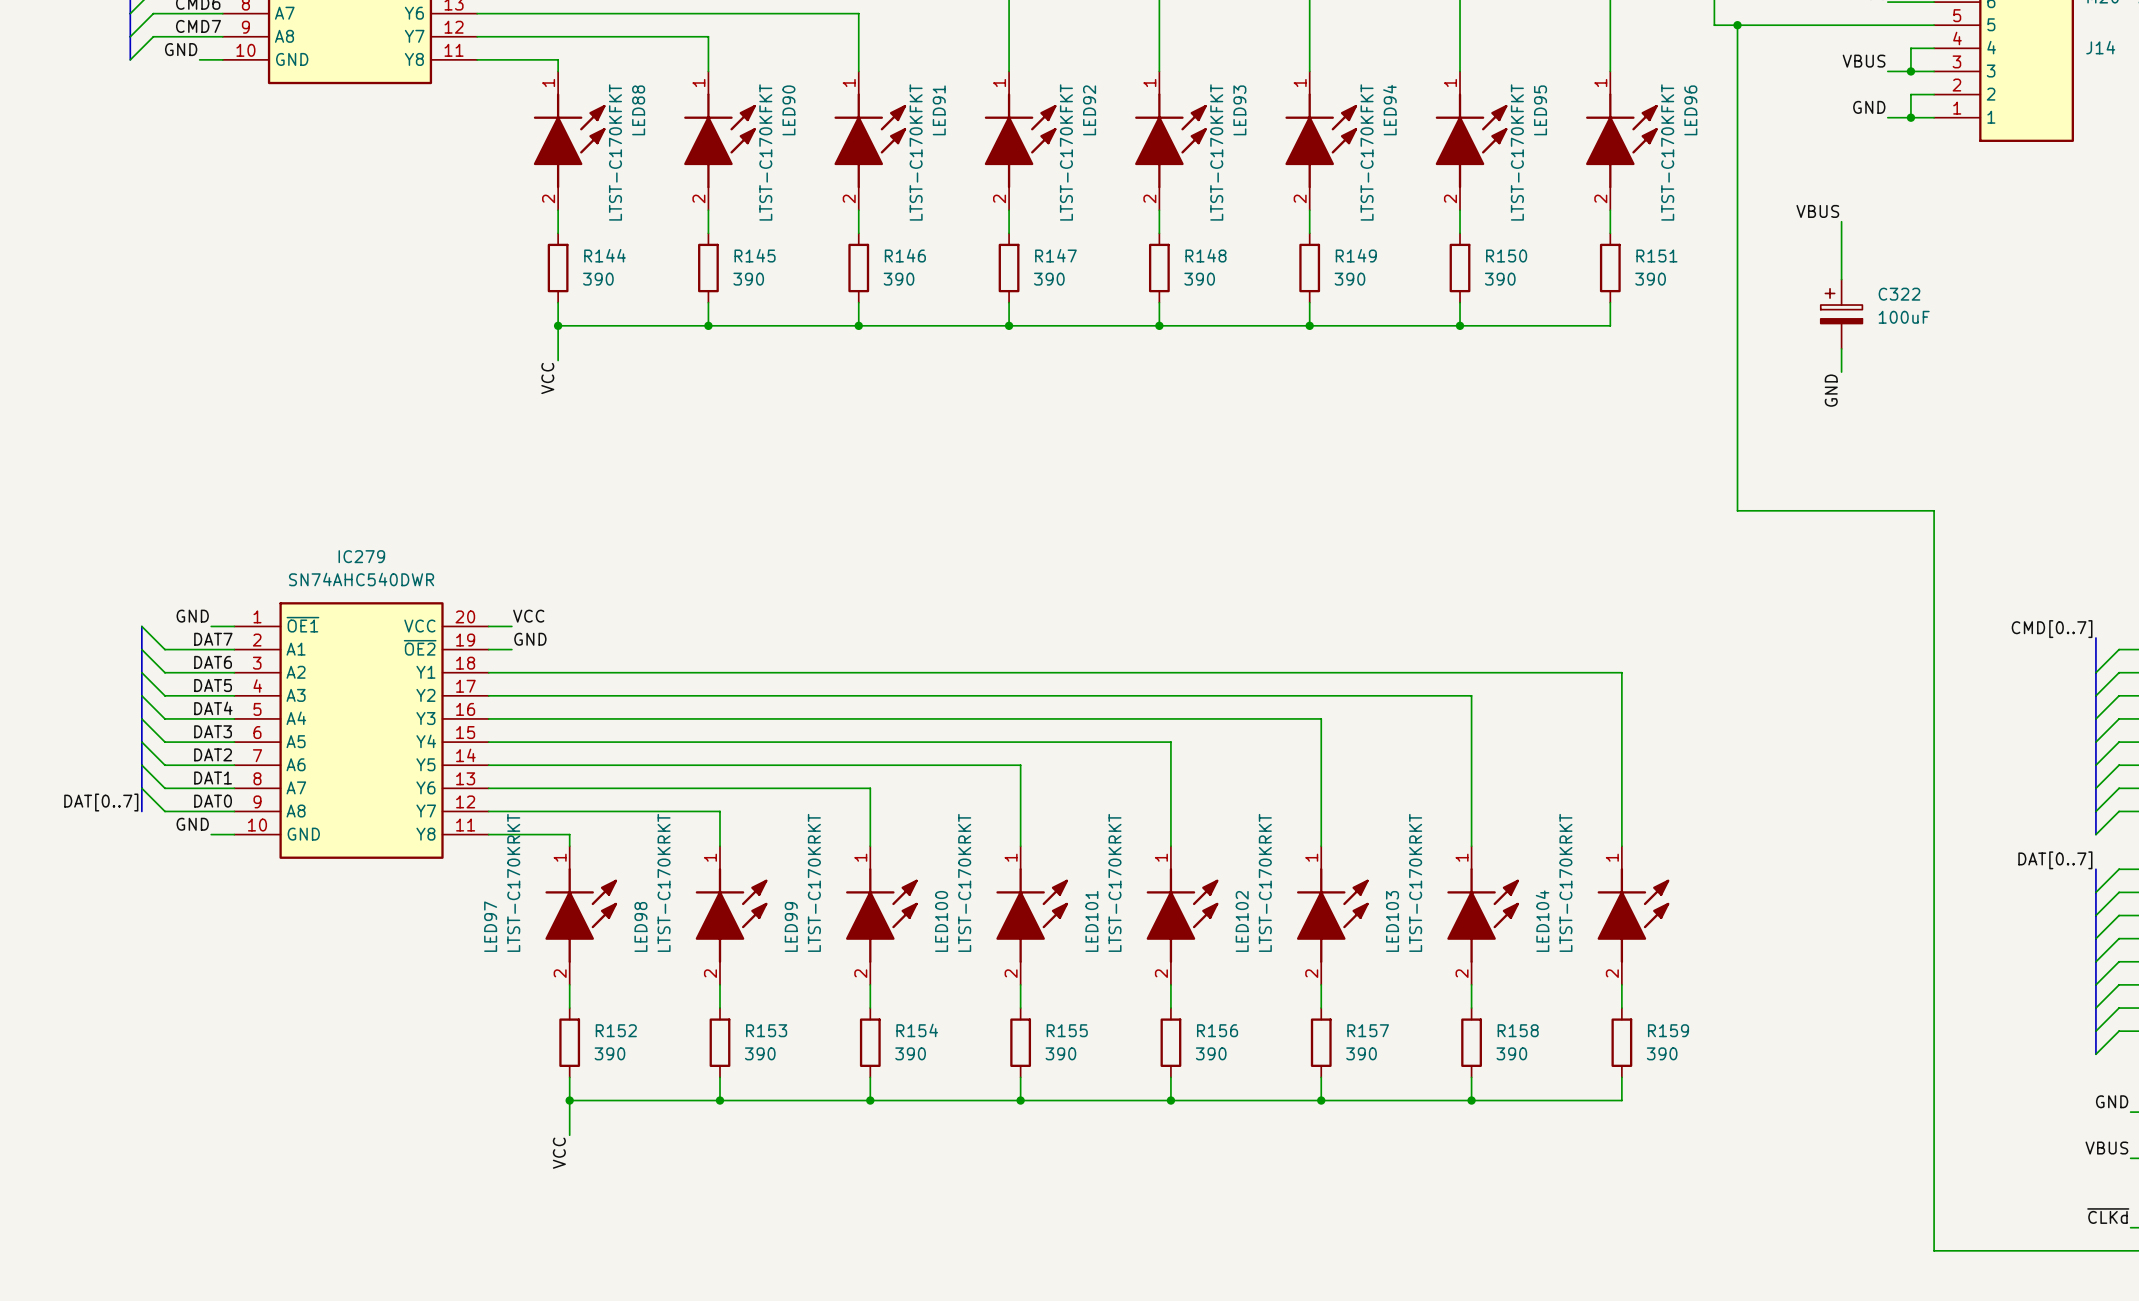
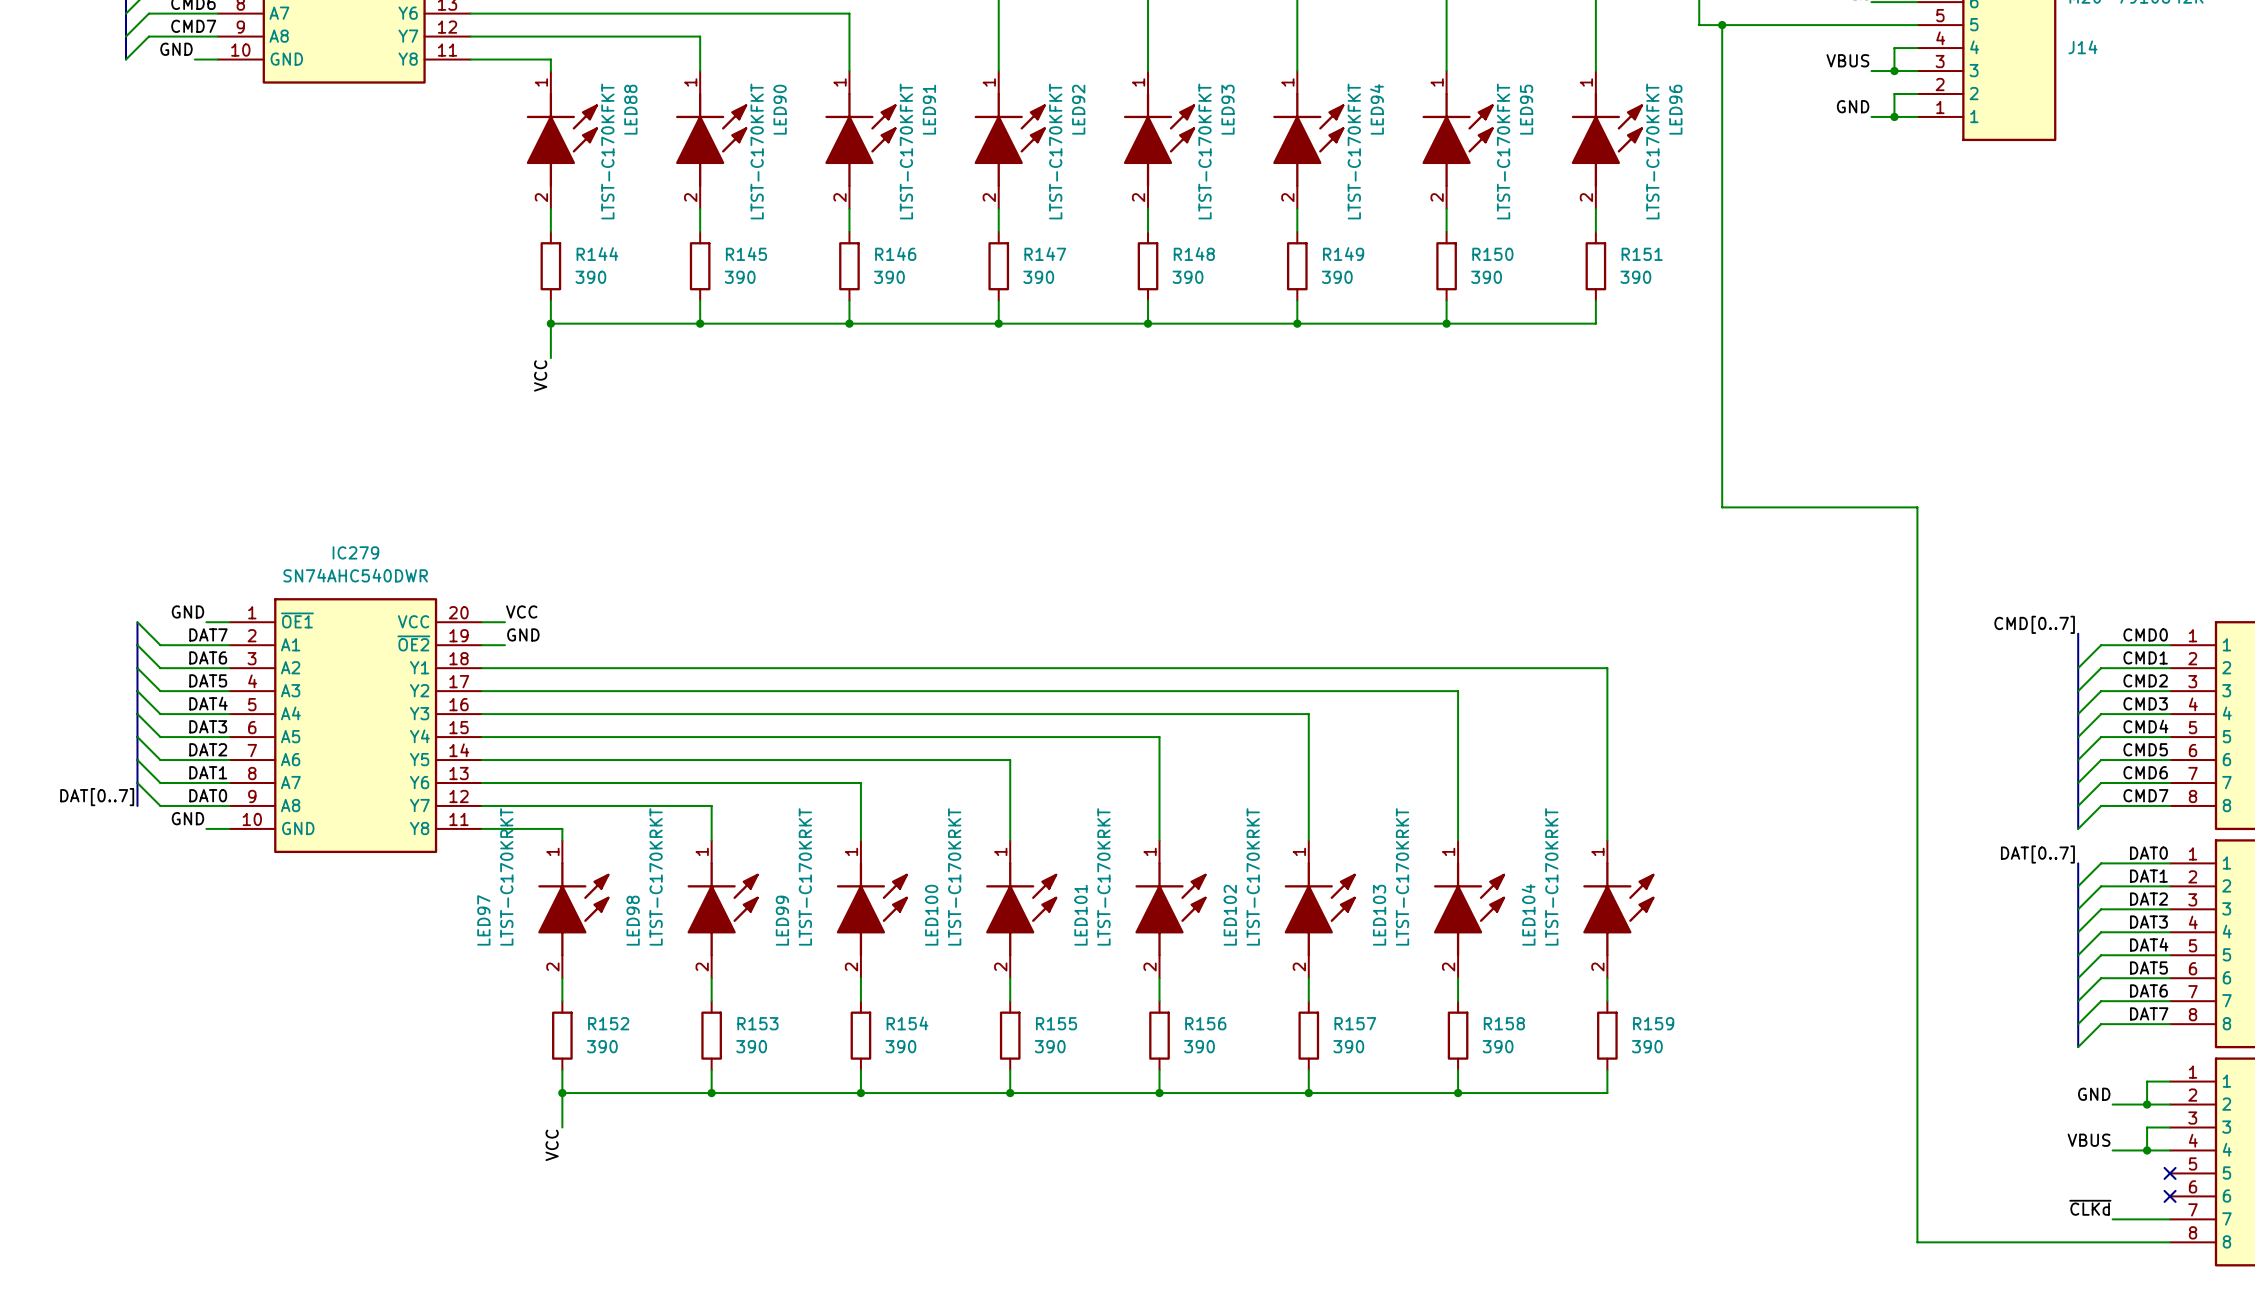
label: VBUS (1817, 211) -> none
wire: (1841, 221) (1841, 279) -> none
C322: 100uF (1841, 314) -> none
wire: (1841, 348) (1841, 372) -> none
label: GND (1831, 390) -> none

